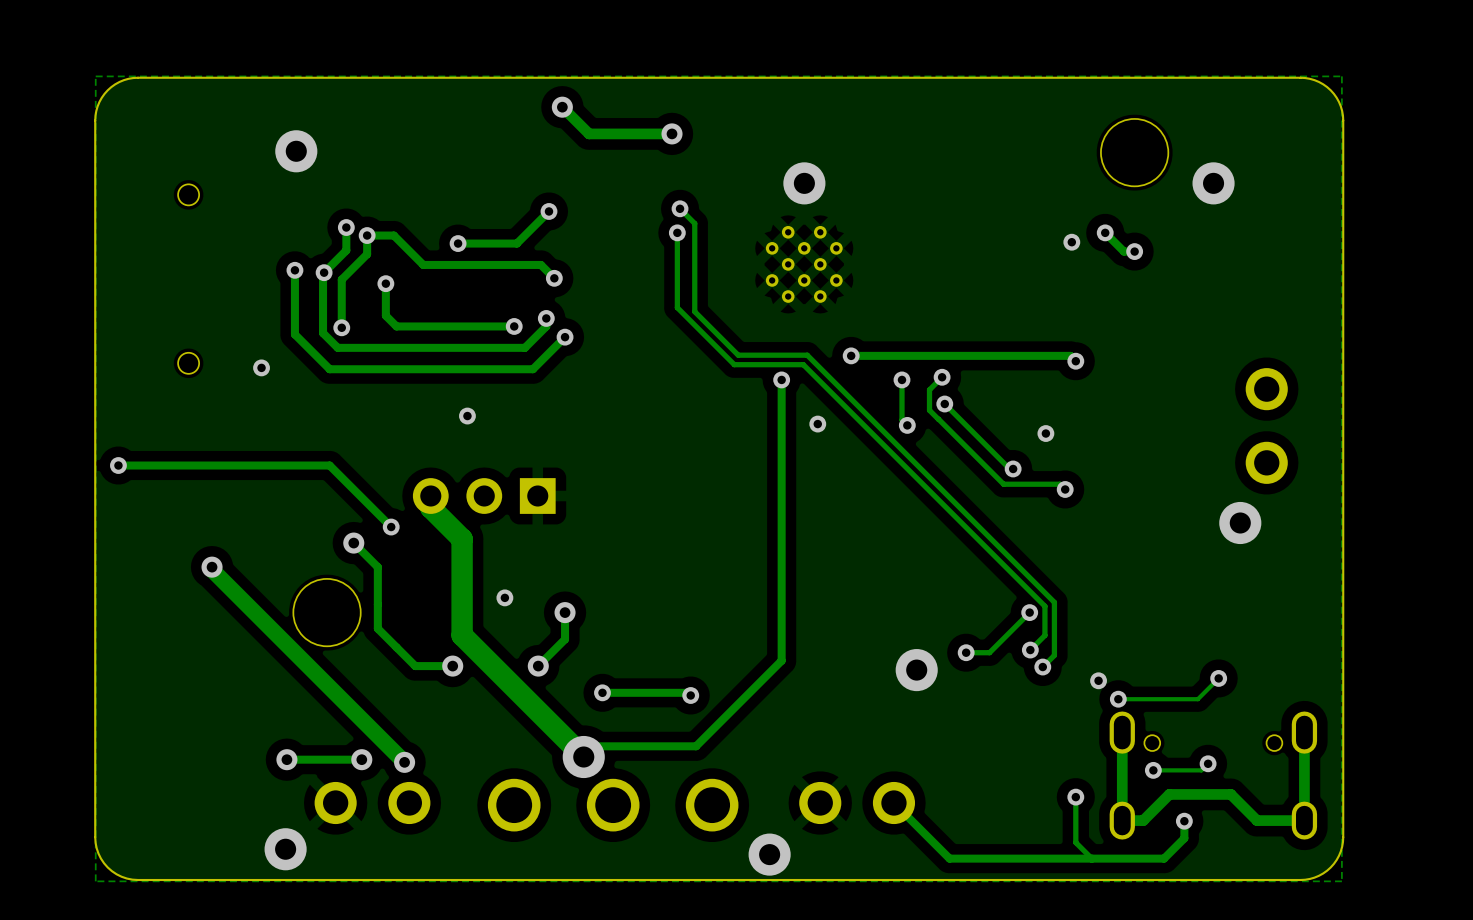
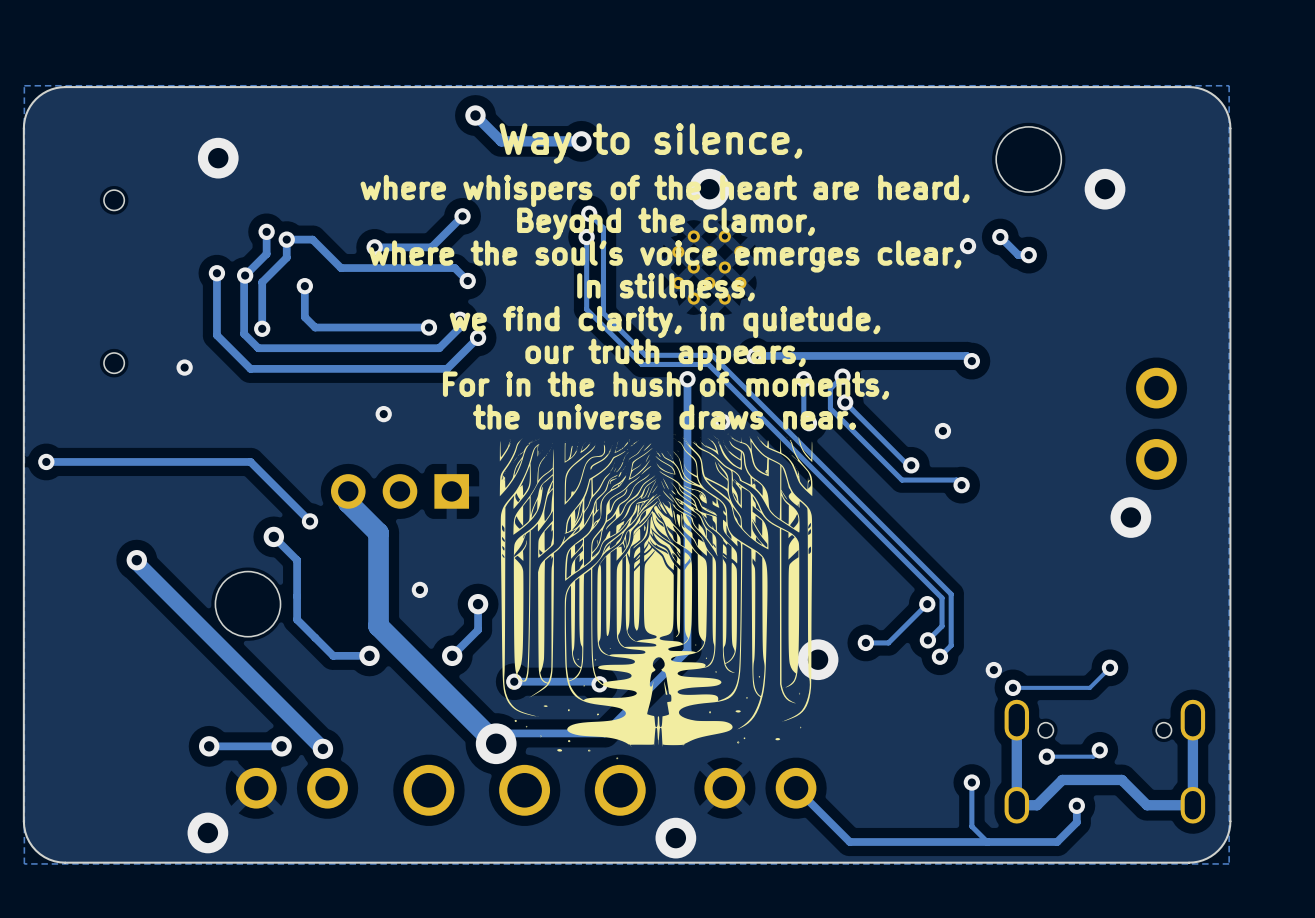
text: none -> Way to silence, (650, 143)
text: none -> where whispers of the heart are heard, (665, 190)
text: none -> Beyond the clamor, (666, 223)
text: none -> where the soul's voice emerges clear, (665, 256)
text: none -> In stillness, (666, 287)
text: none -> we find clarity, in quietude, (665, 322)
text: none -> our truth appears, (665, 354)
text: none -> For in the hush of moments, (666, 385)
text: none -> the universe draws near. (664, 416)
drawing: none -> [499, 429, 813, 760]

